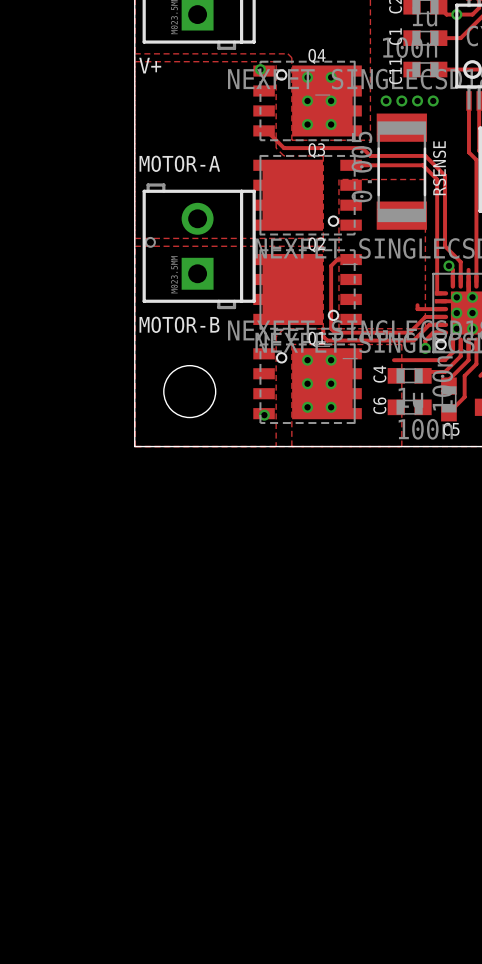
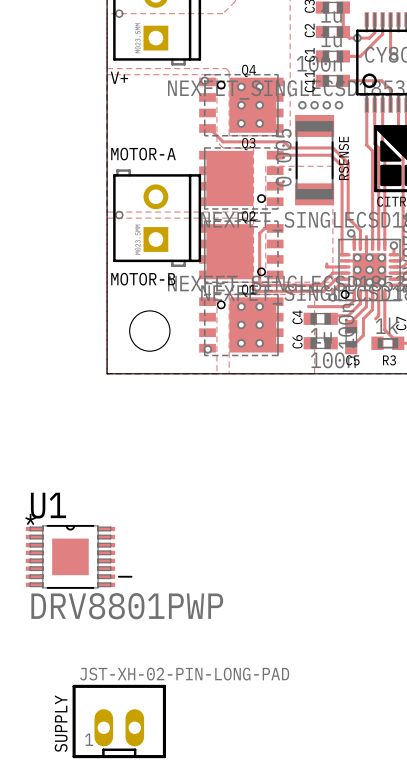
U1: none -> DRV8801PWP (79, 556)
SUPPLY: none -> JST-XH-02-PIN-LONG-PAD (119, 721)

